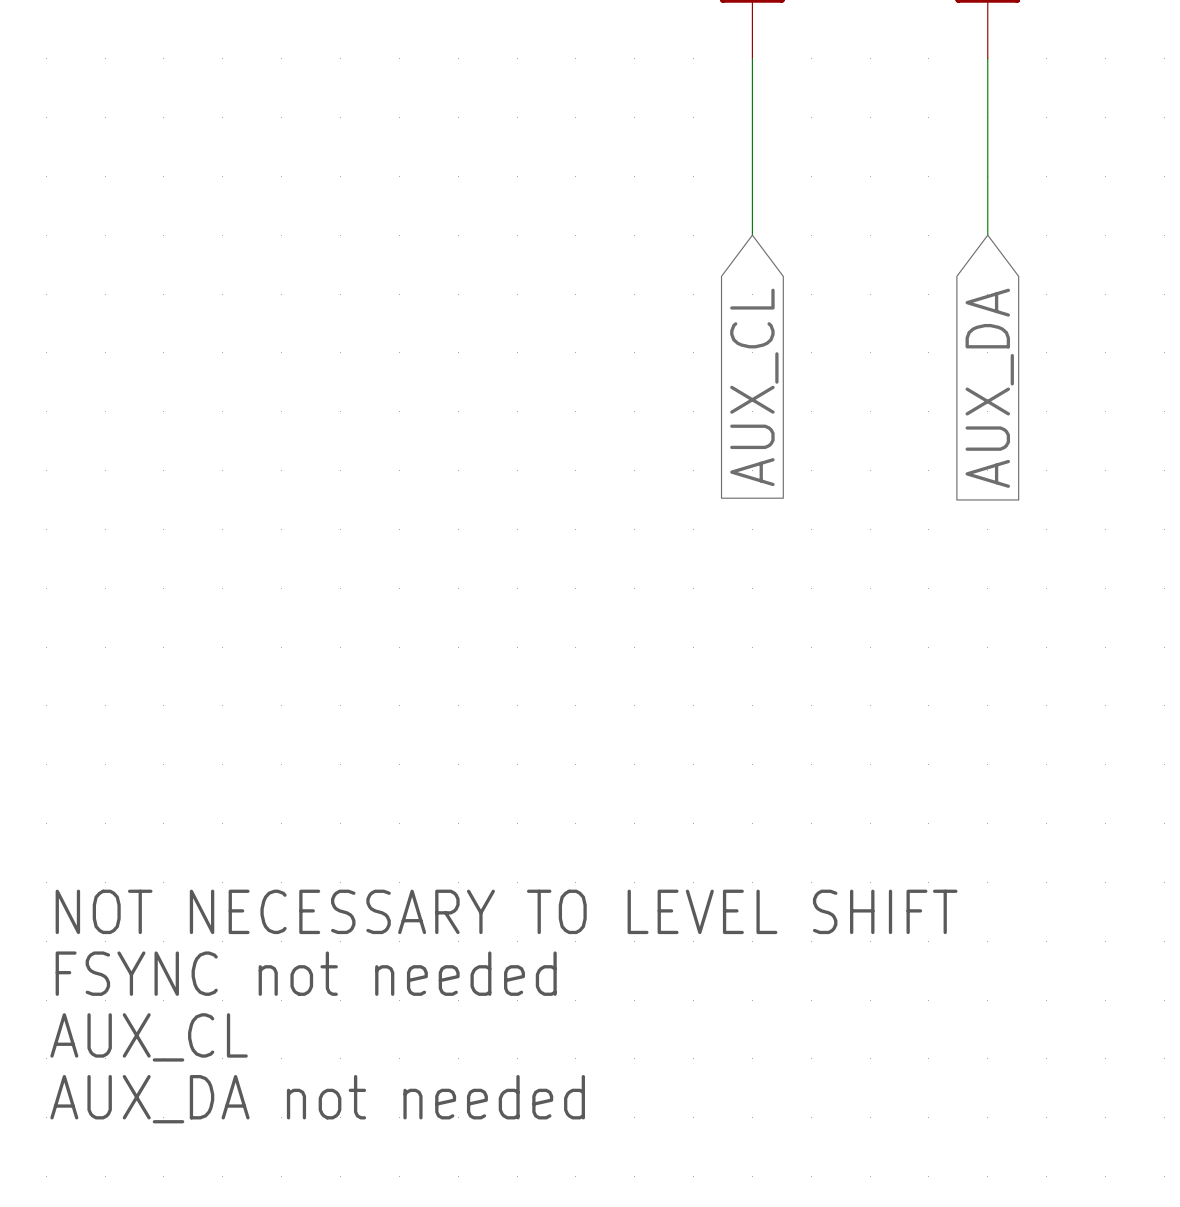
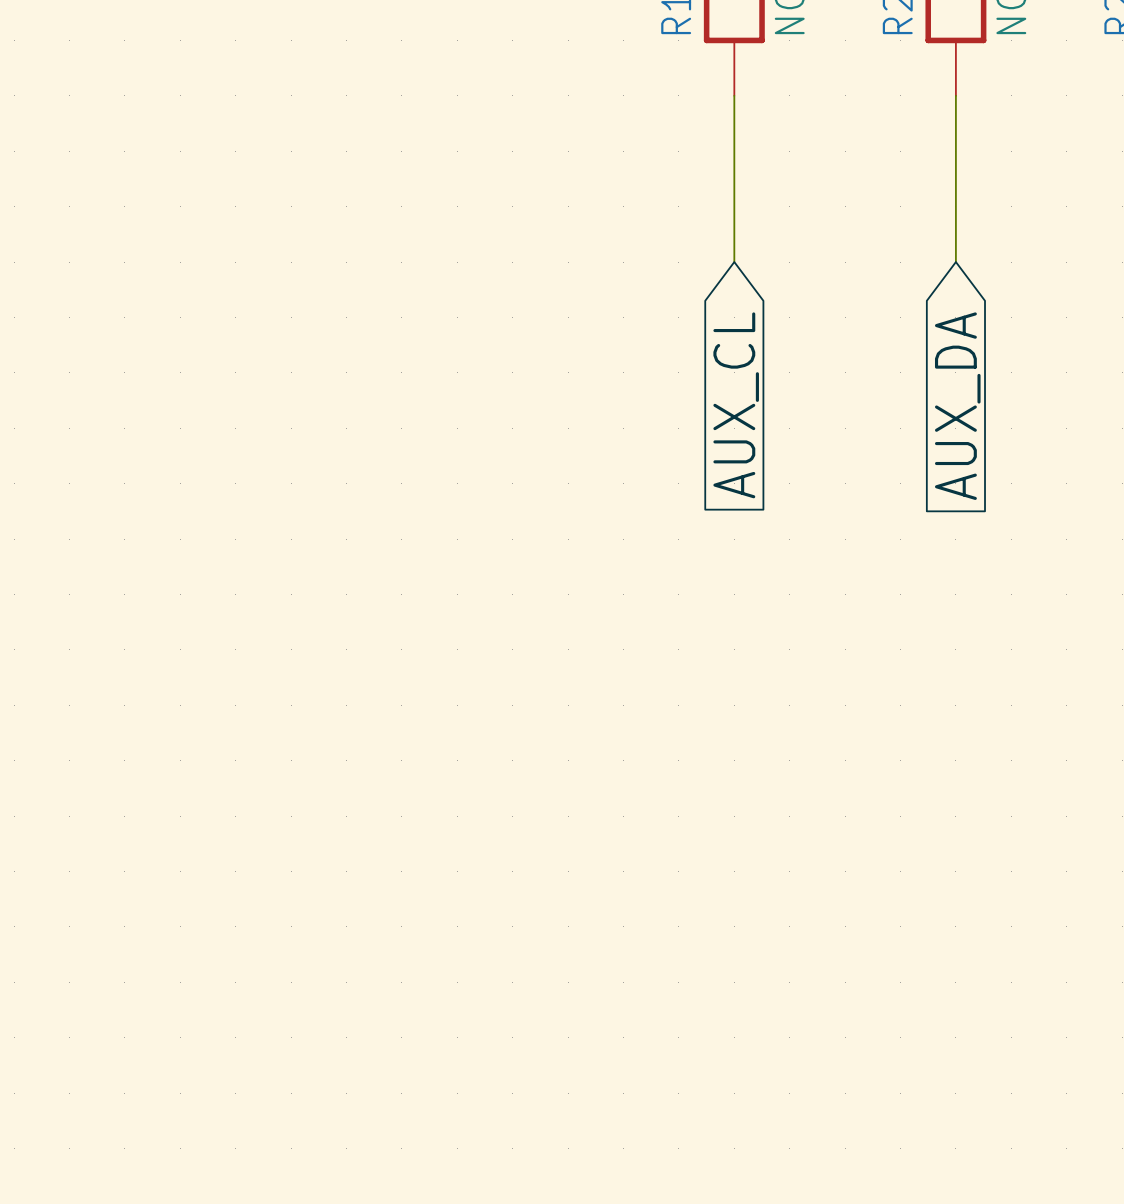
text: NOT NECESSARY TO LEVEL SHIFT (506, 911) -> none
text: FSYNC not needed (306, 973) -> none
text: AUX_CL (149, 1037) -> none
text: AUX_DA not needed (317, 1099) -> none

